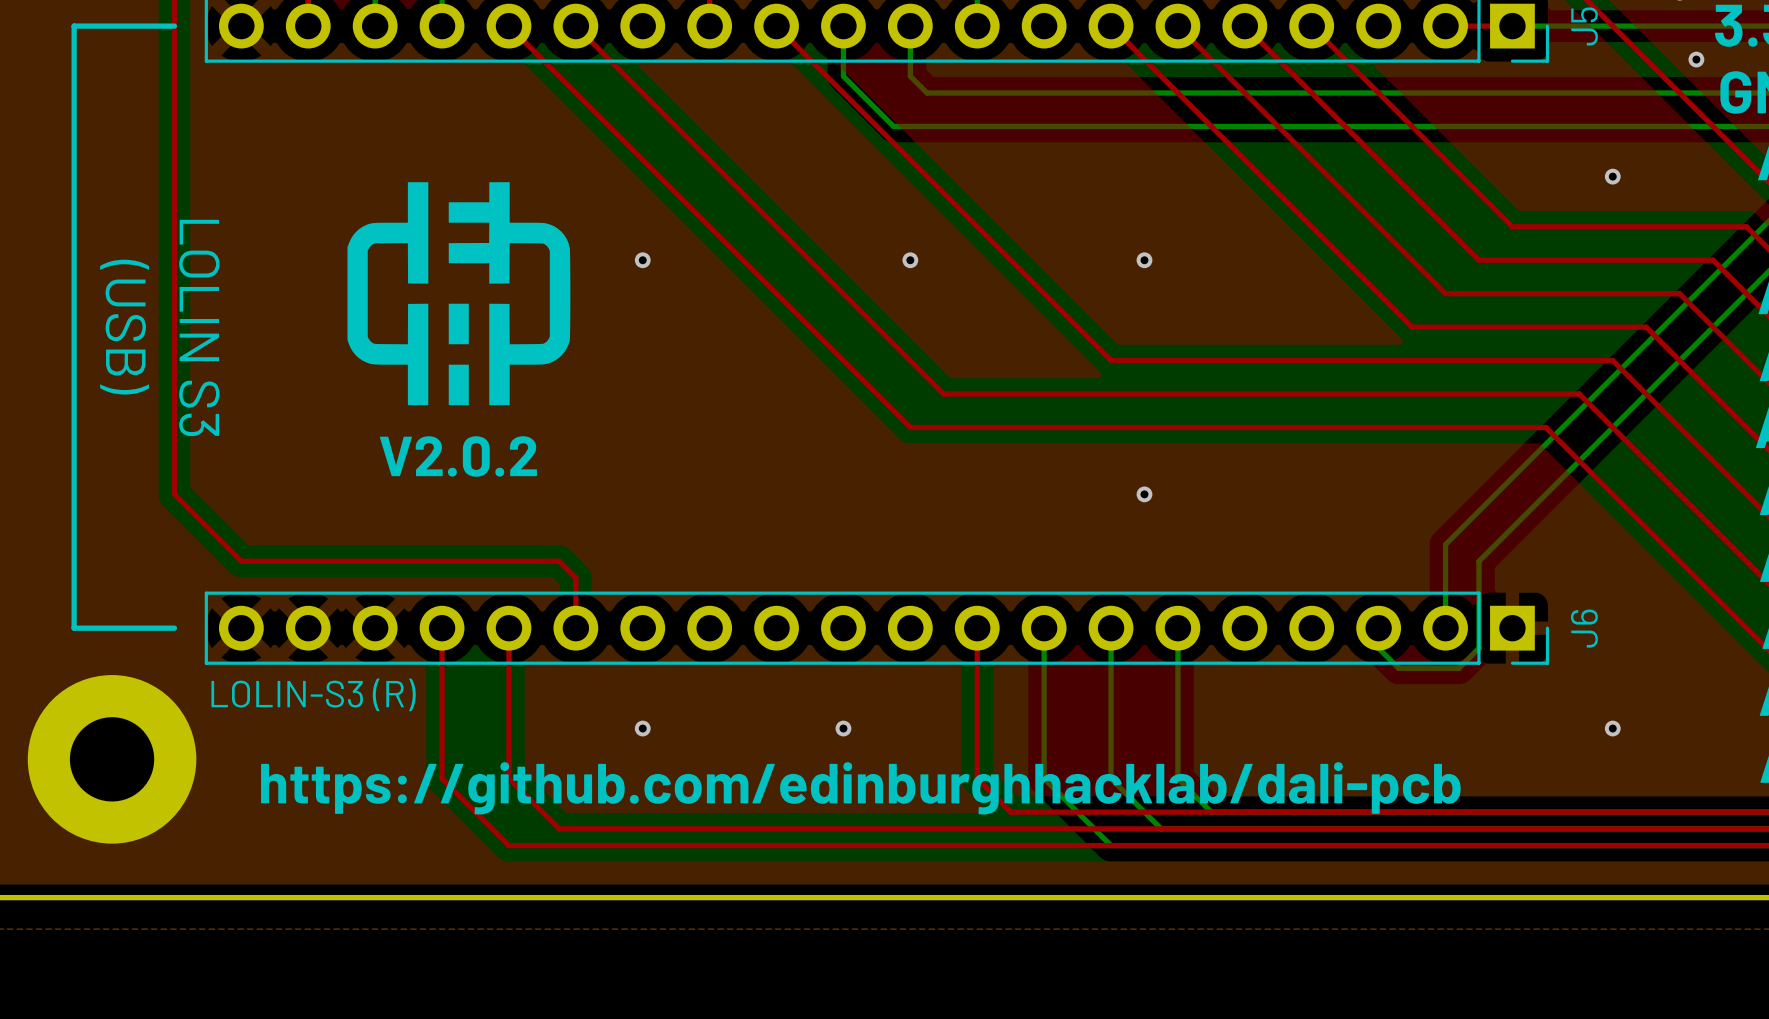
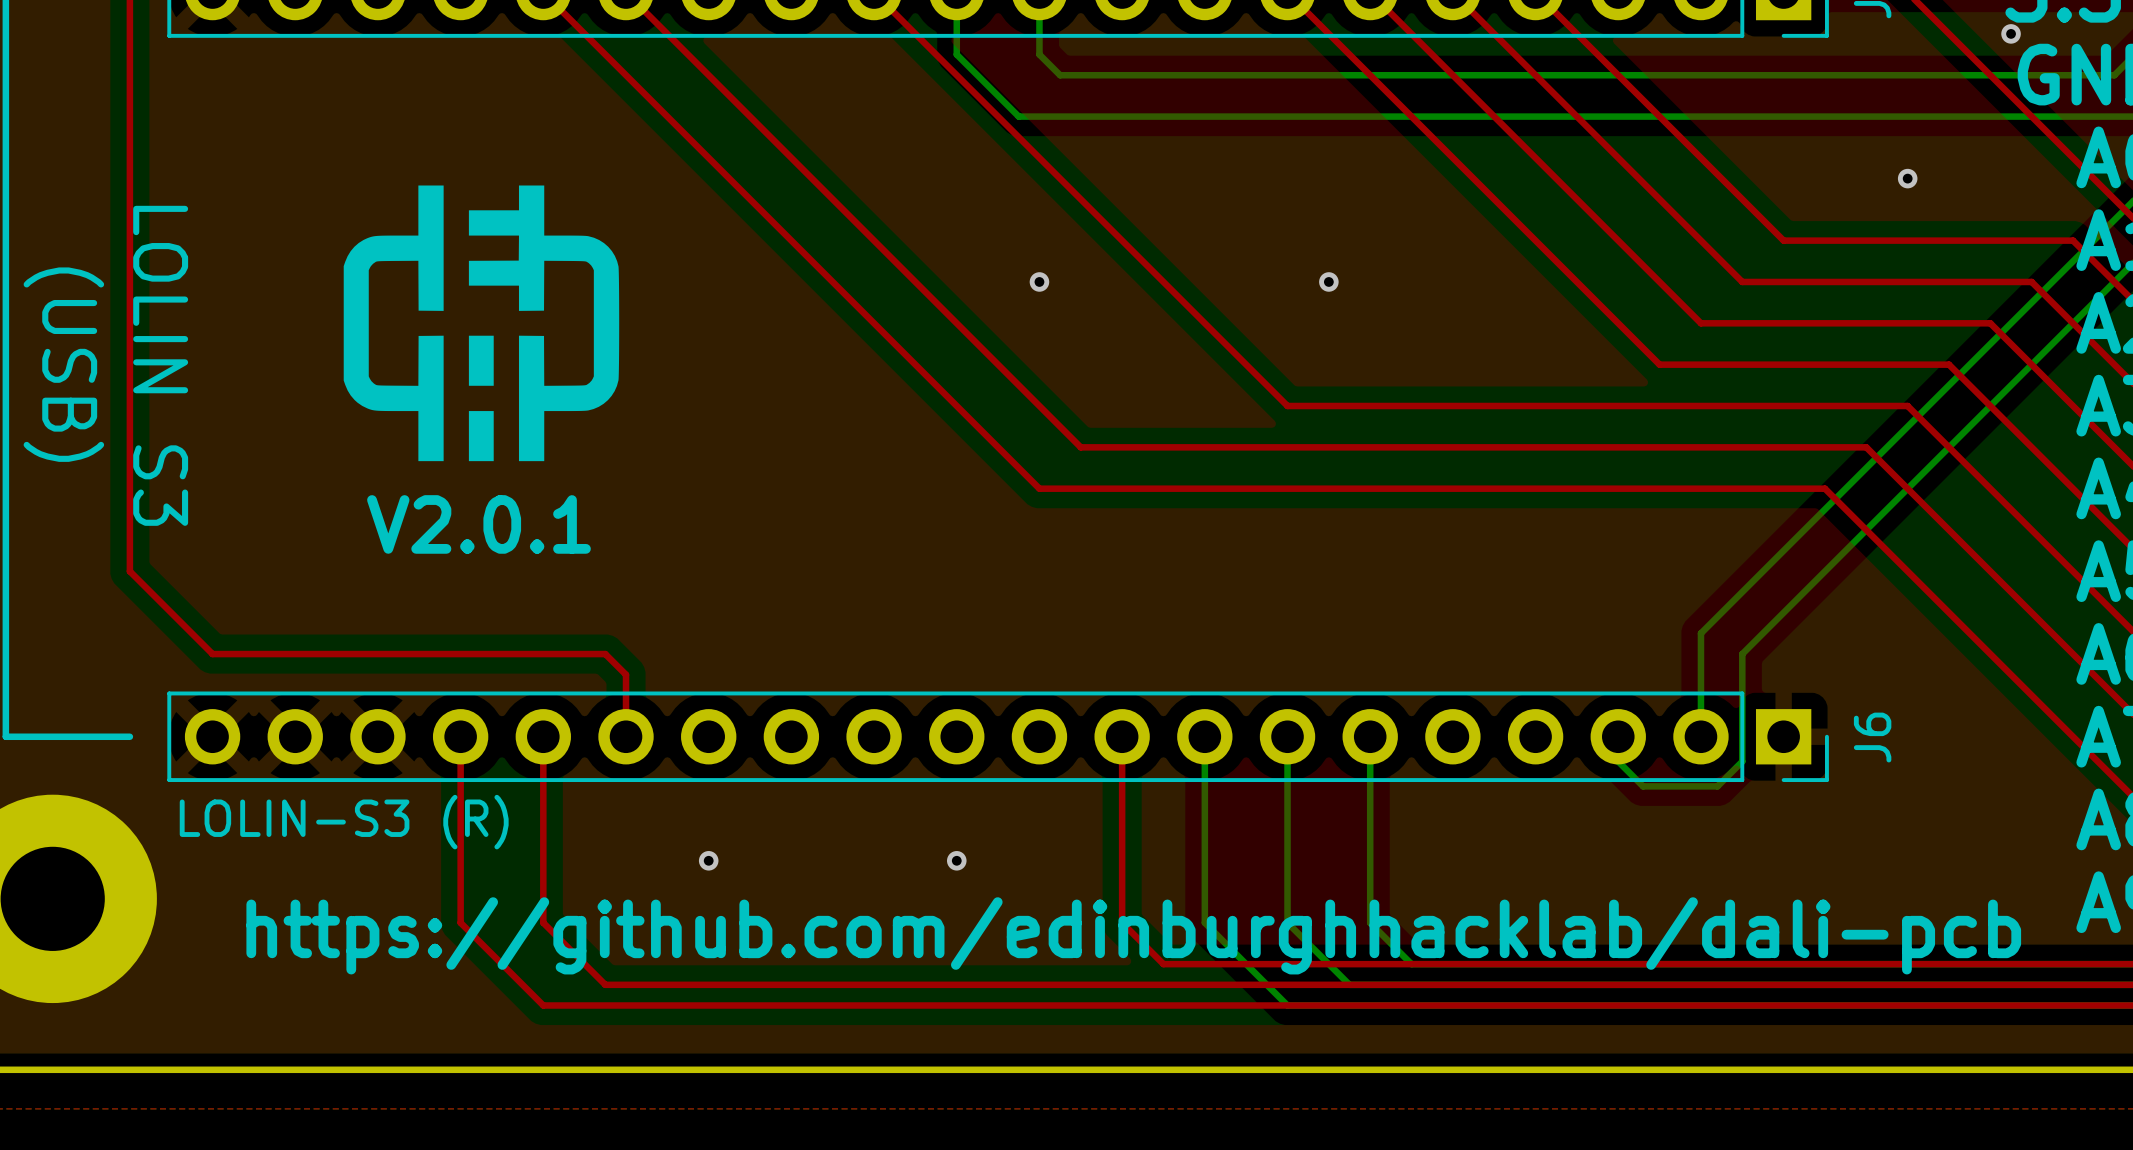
via: (642, 260) -> none
text: V2.0.2 (458, 456) -> V2.0.1 (478, 524)
via: (1144, 494) -> none
via: (1612, 728) -> none

